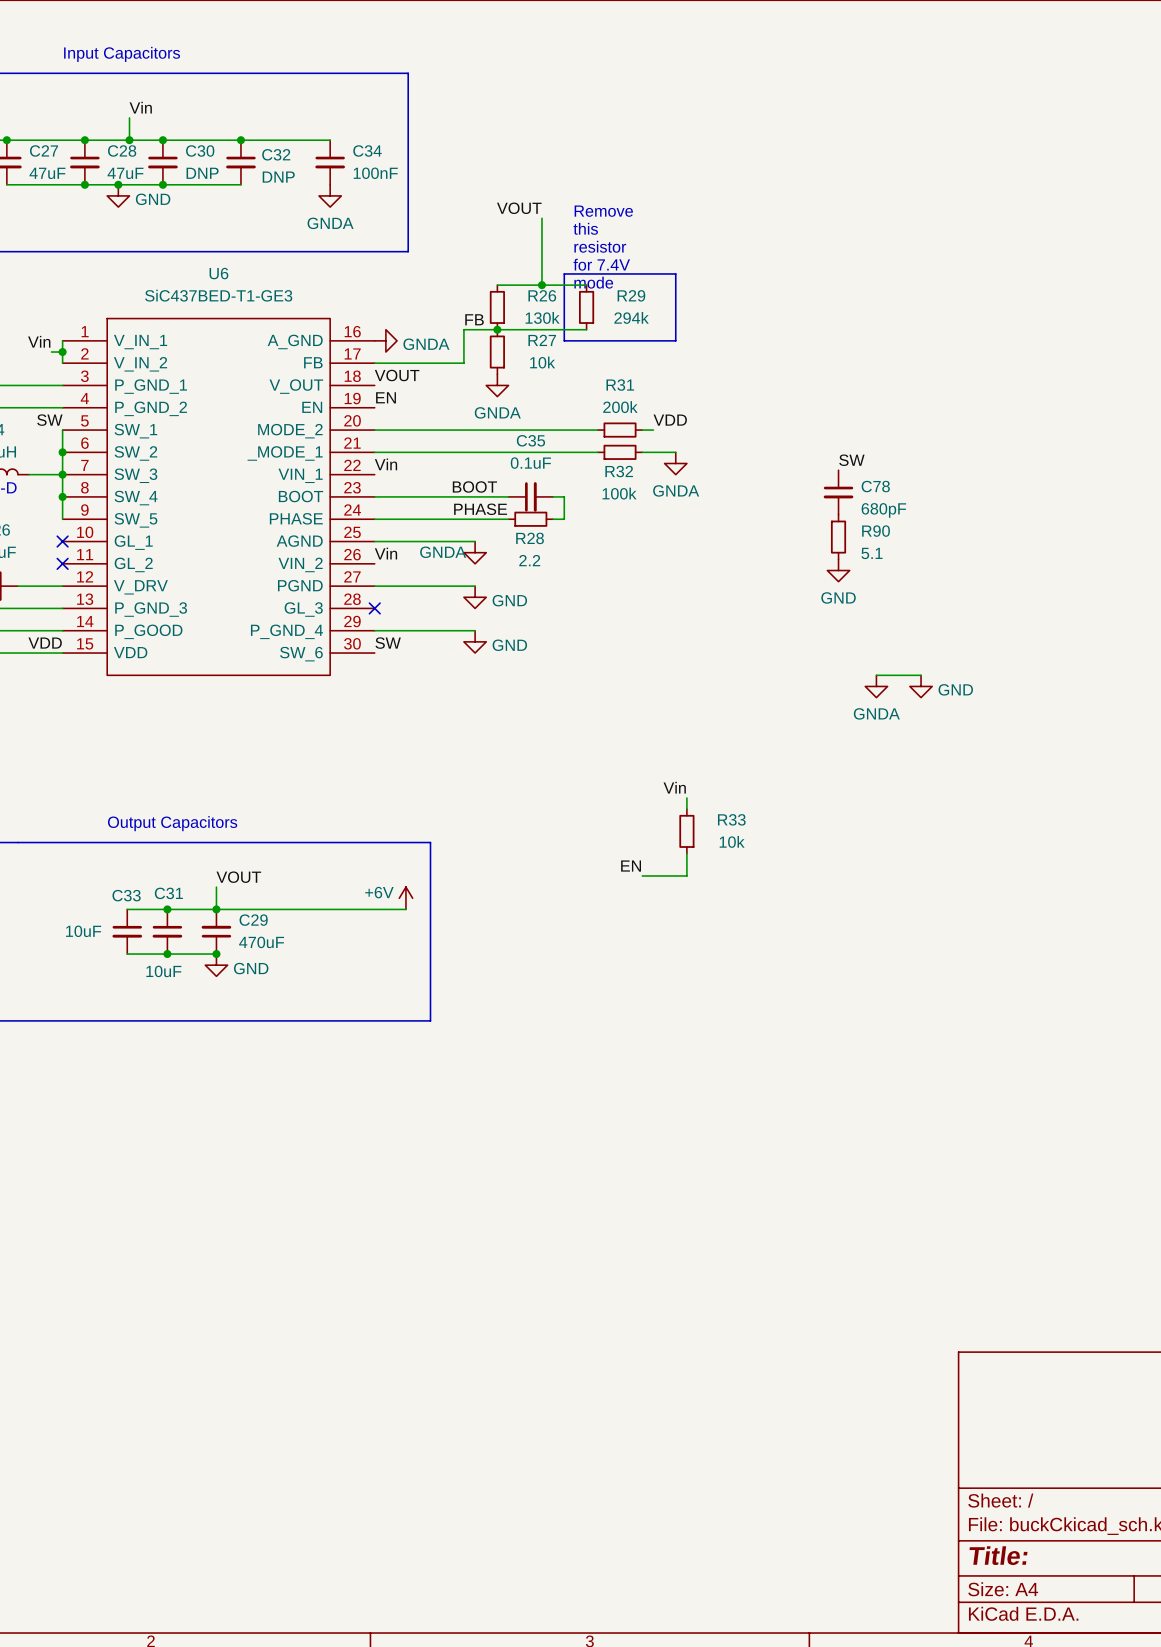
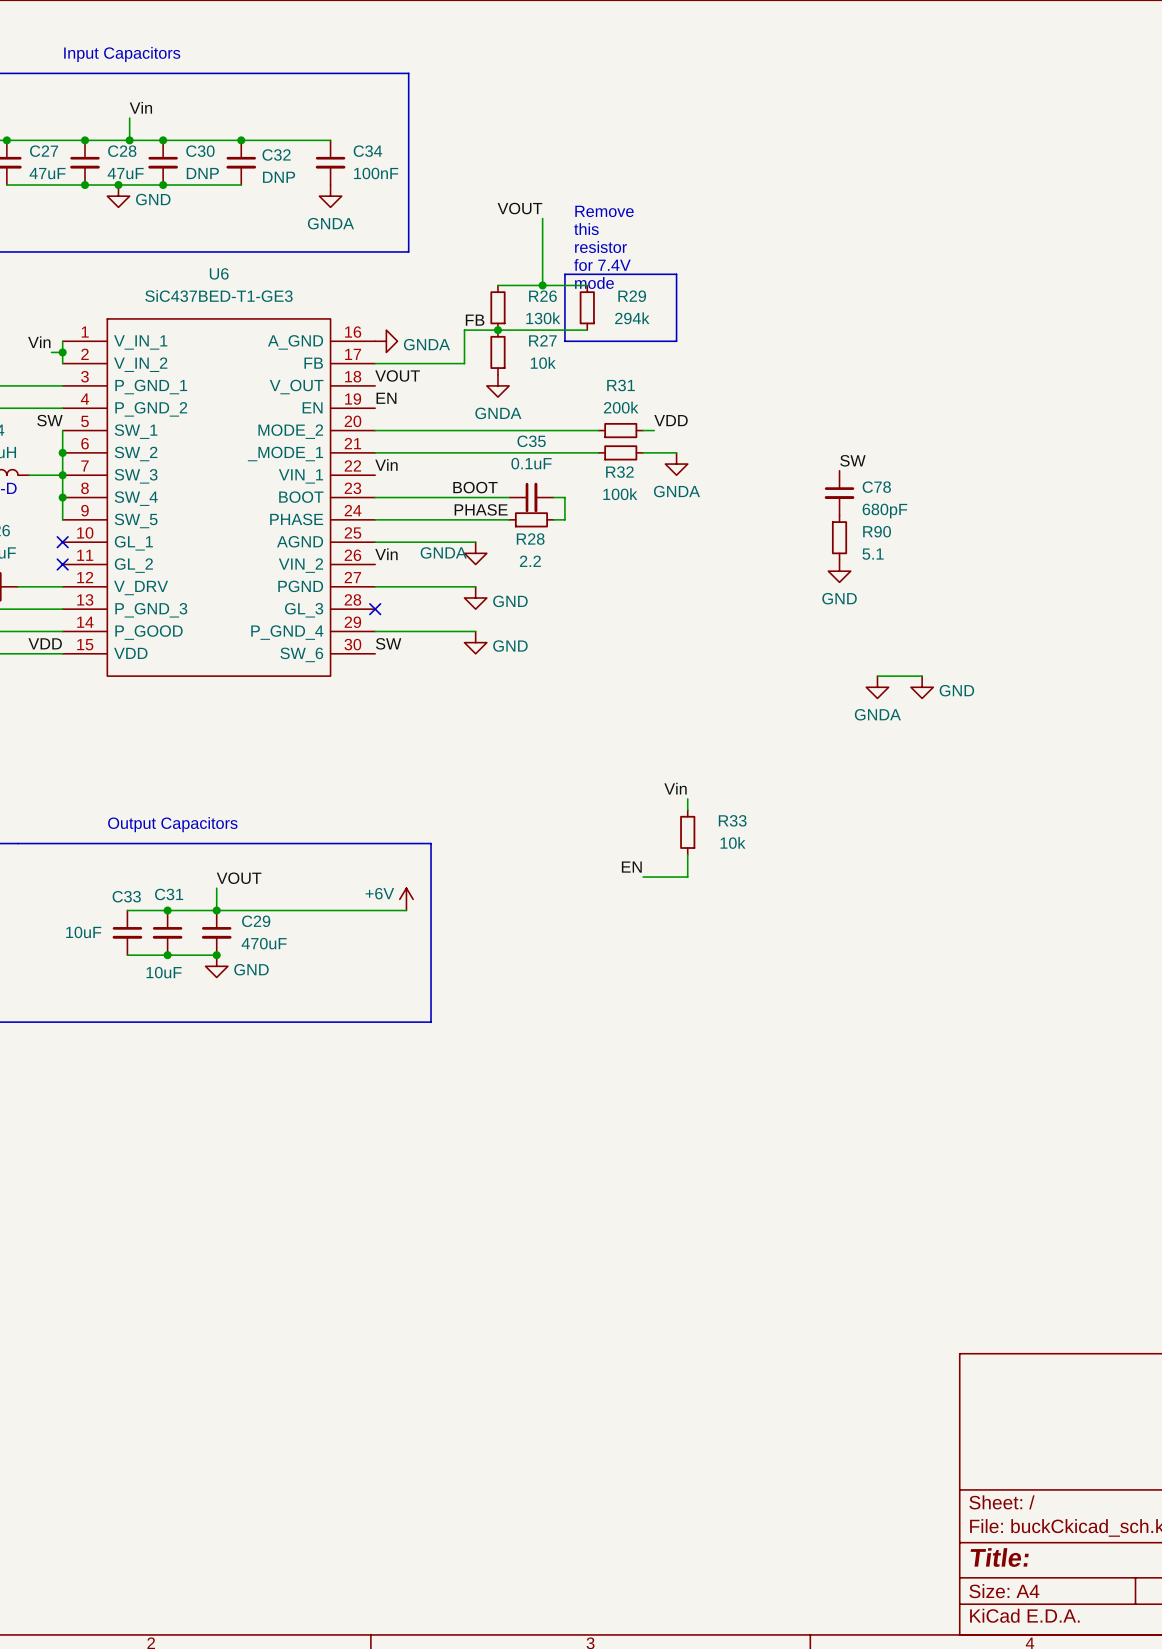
C29 rotation: 0° (216, 931) -> 180° (216, 932)

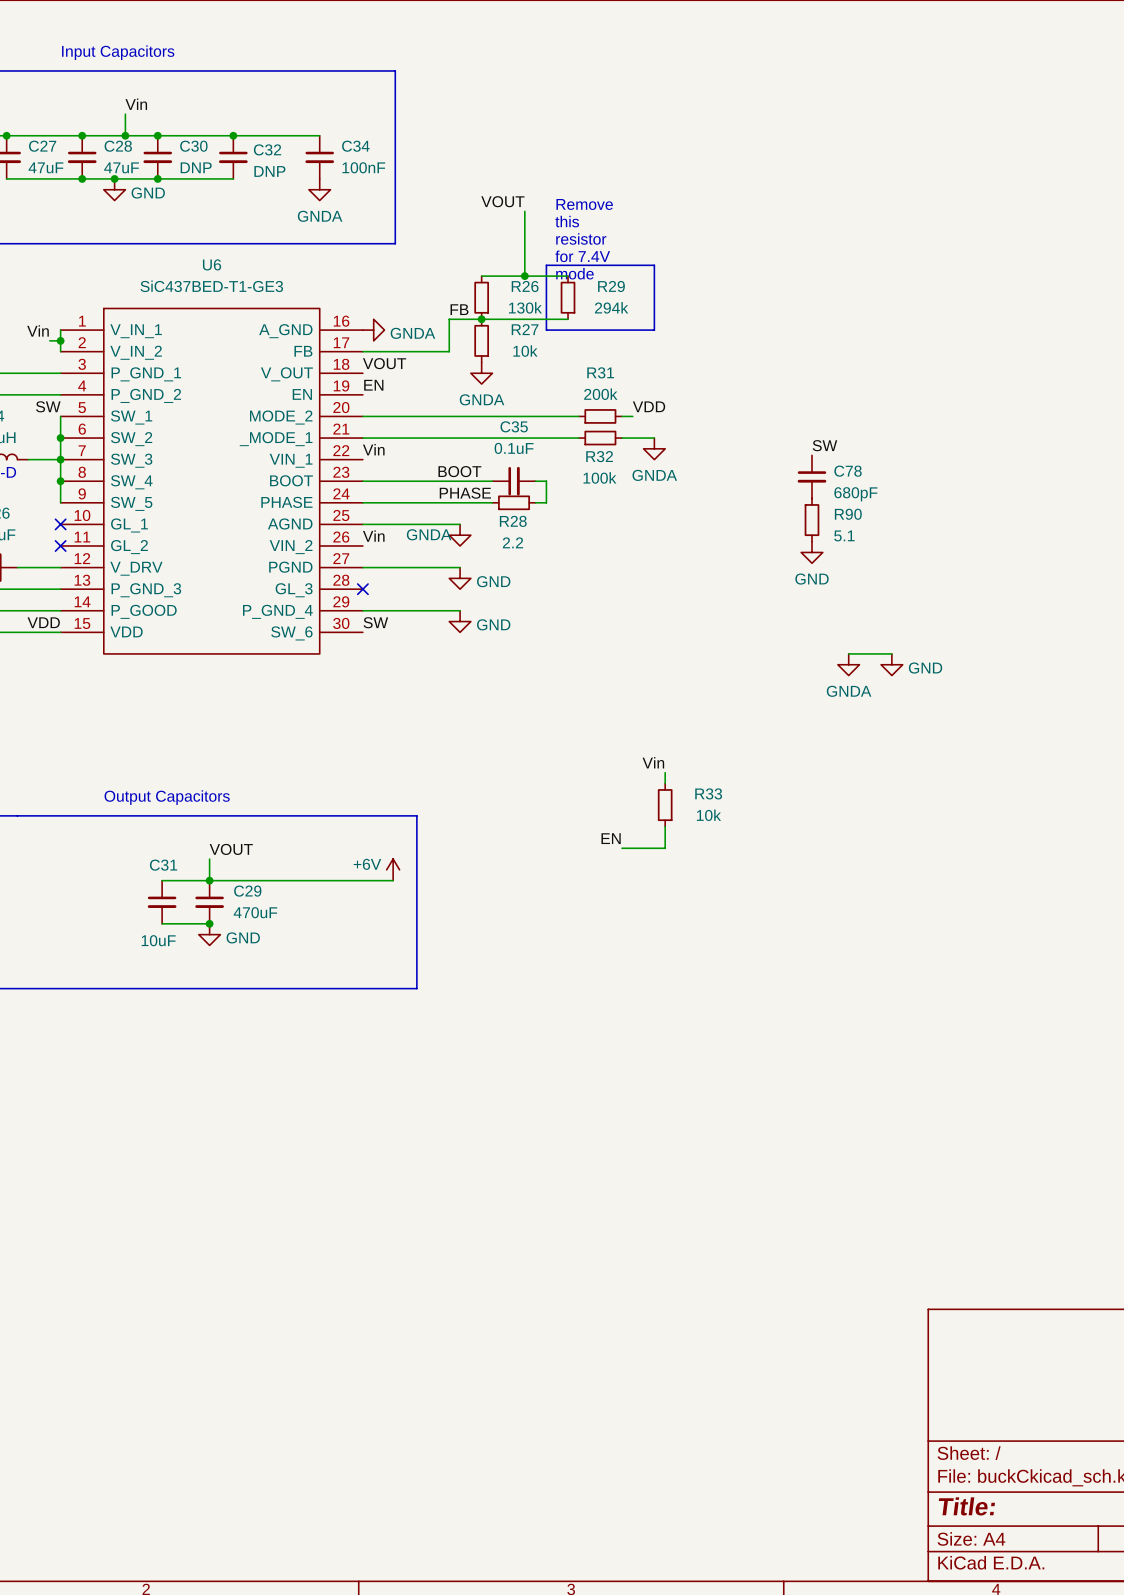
wire: (127, 910) (167, 910) -> none
junction: (167, 910) -> none
C33: 10uF (127, 932) -> none
wire: (127, 955) (167, 955) -> none
junction: (167, 955) -> none

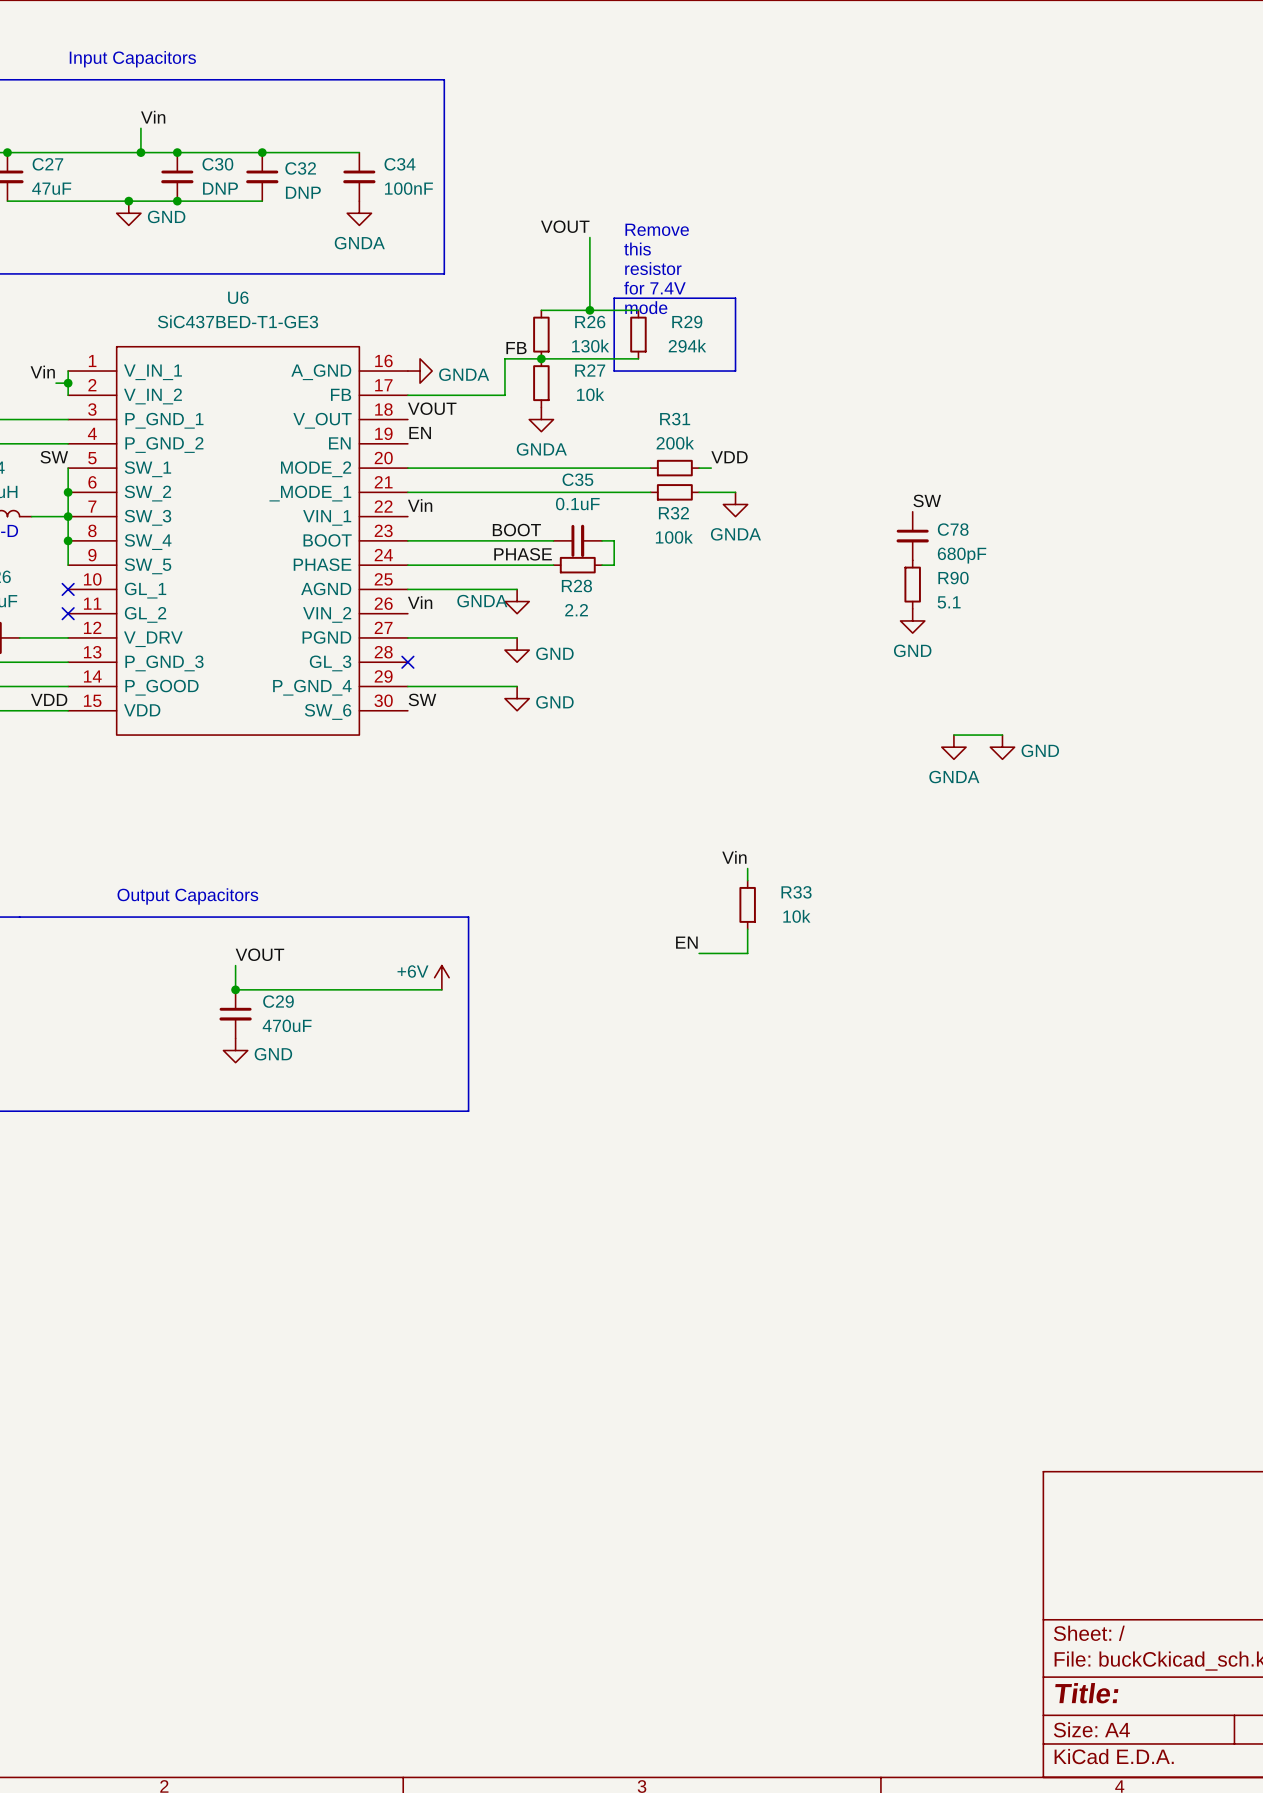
junction: (82, 135) -> none
C28: 47uF (82, 157) -> none
junction: (82, 178) -> none
wire: (162, 880) (209, 880) -> none
C31: 10uF (162, 902) -> none
wire: (162, 923) (209, 923) -> none
junction: (209, 923) -> none

